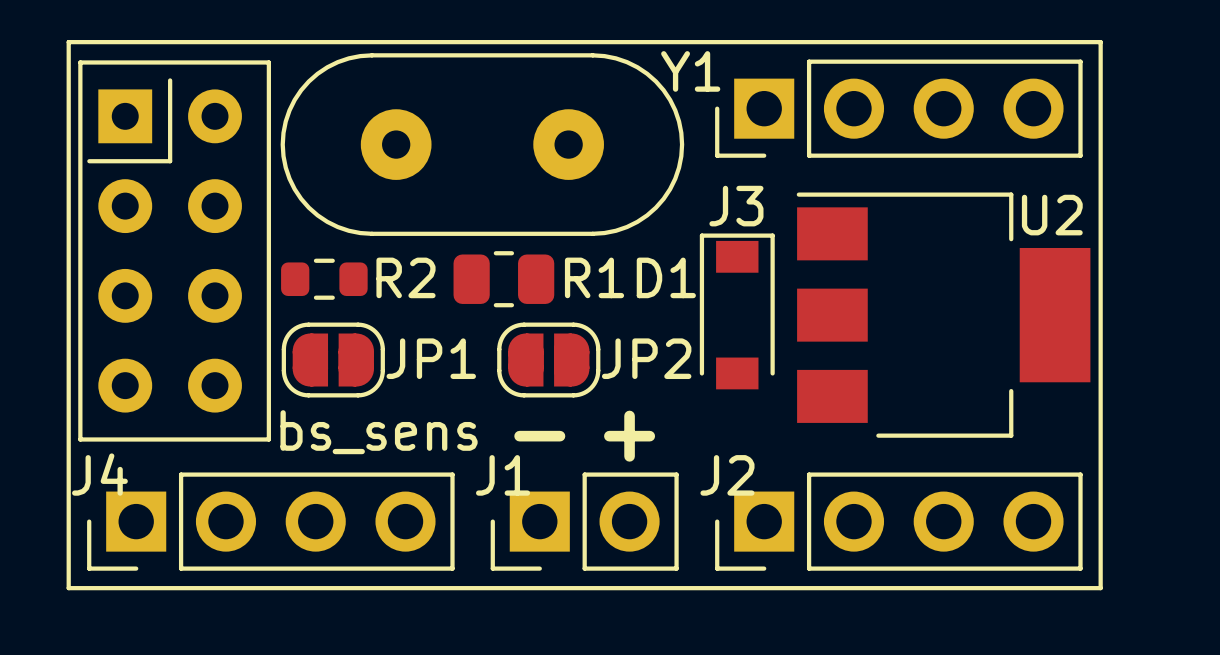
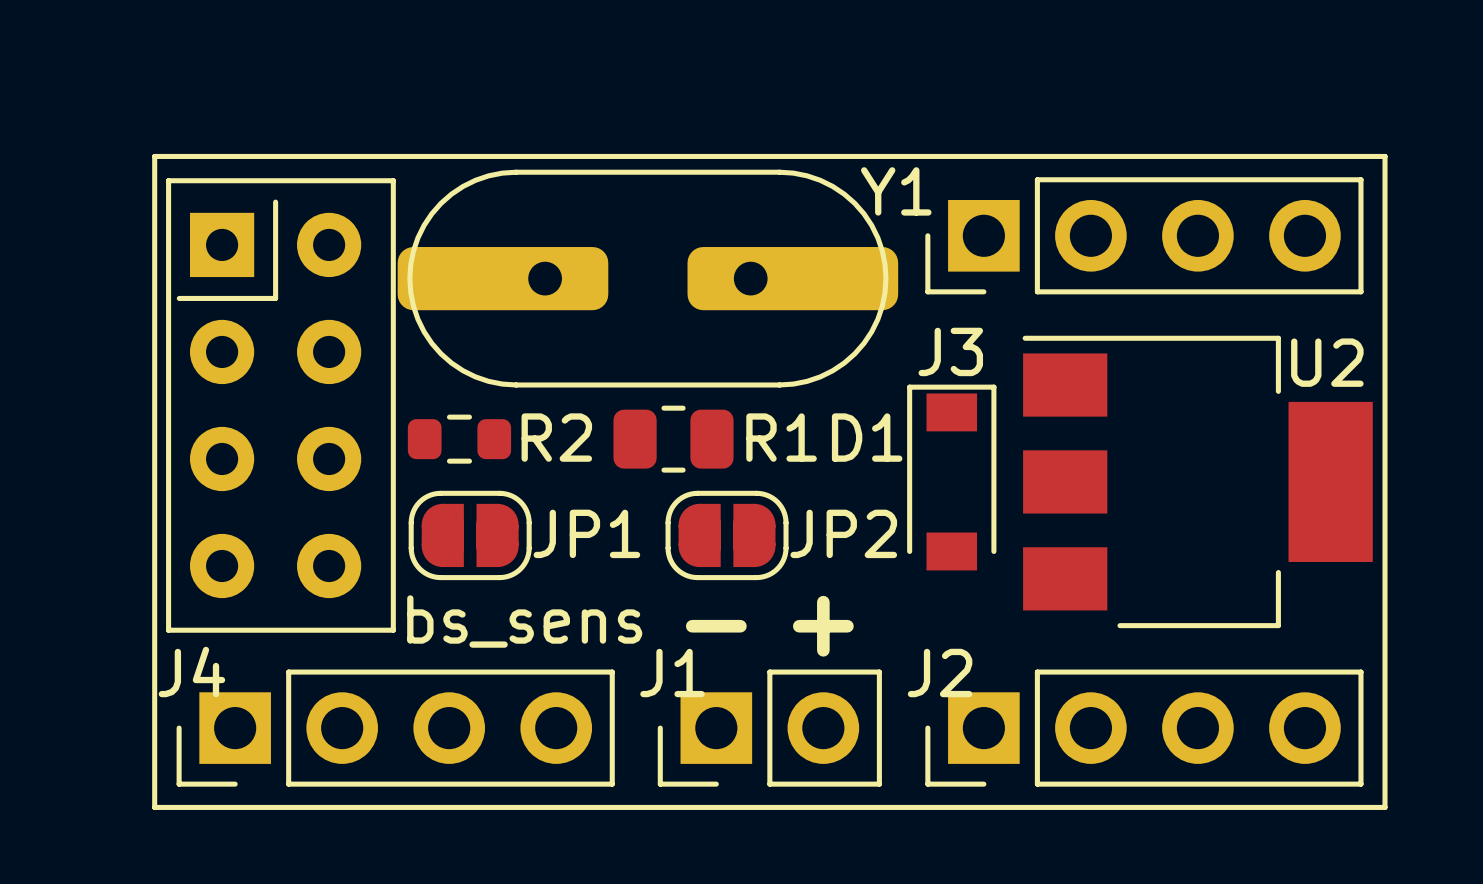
Y1 footprint: [280, 53, 685, 236] -> [397, 169, 899, 388]

